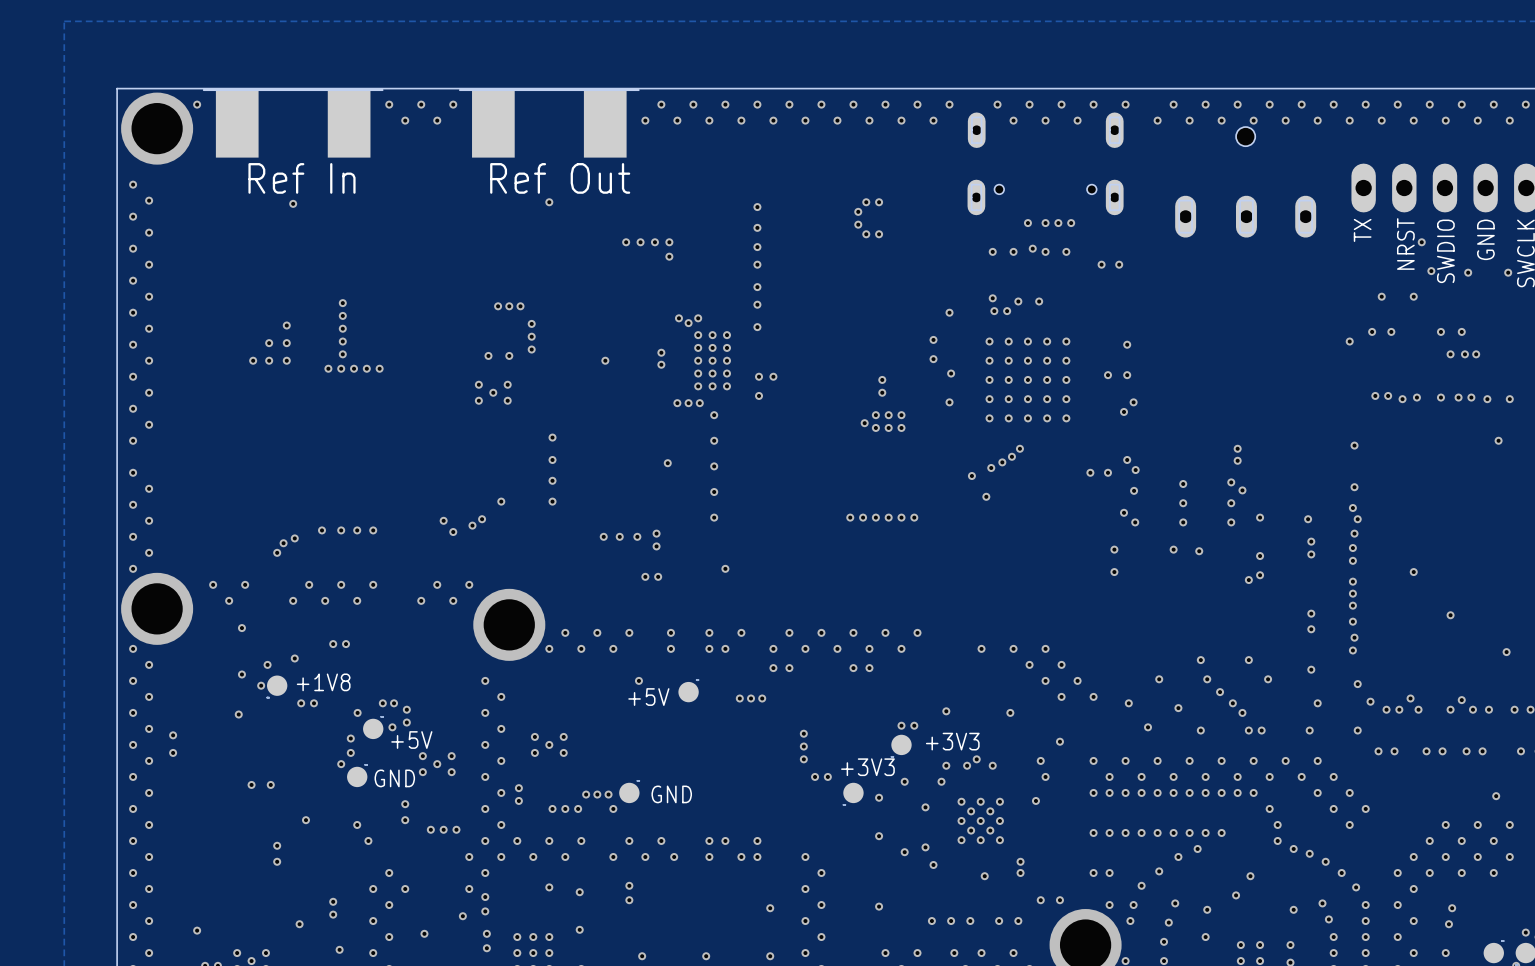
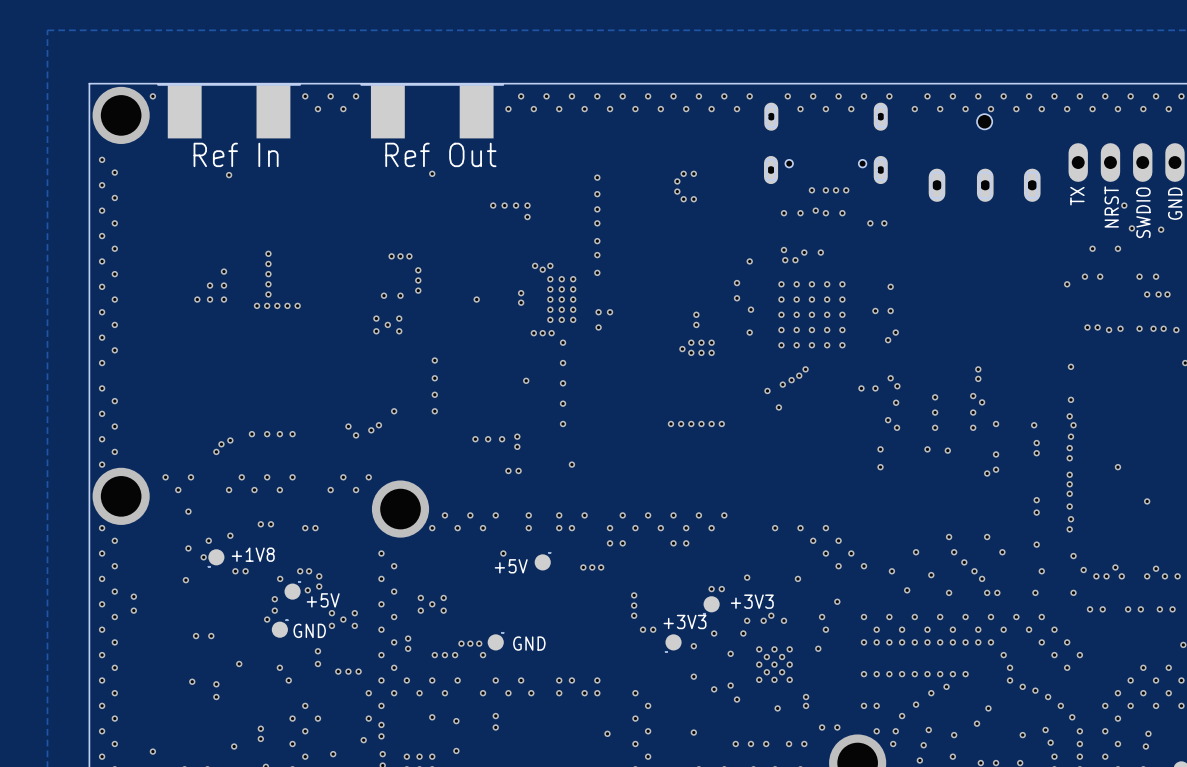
via: none -> (305, 528)
via: none -> (315, 528)
via: none -> (192, 681)

